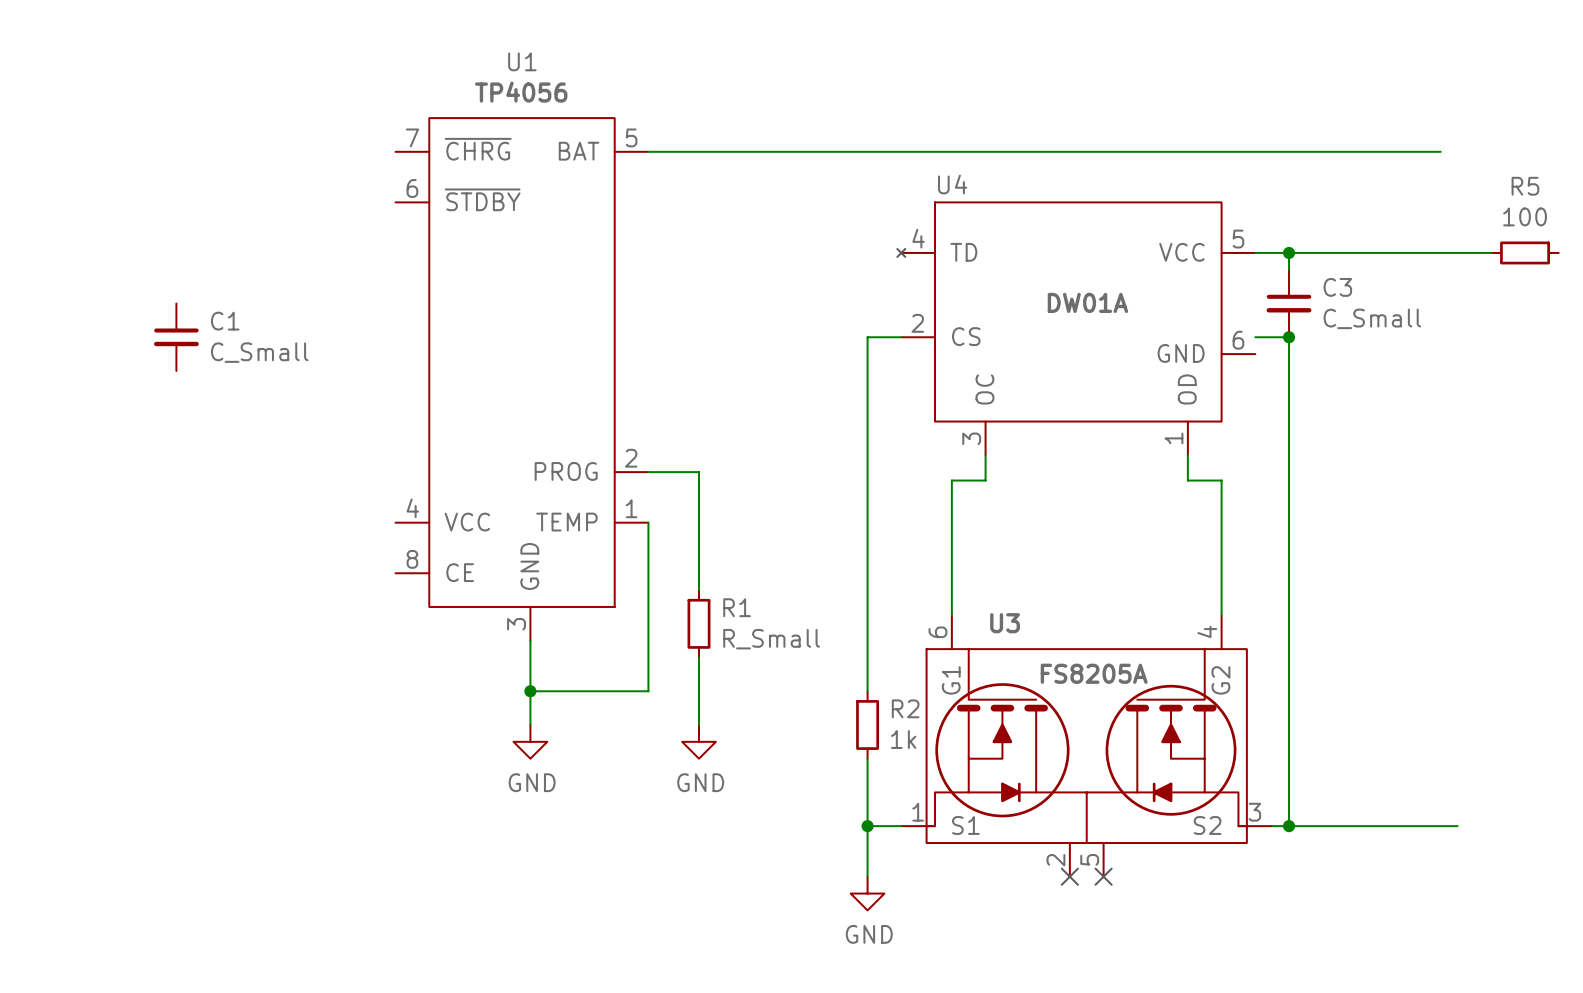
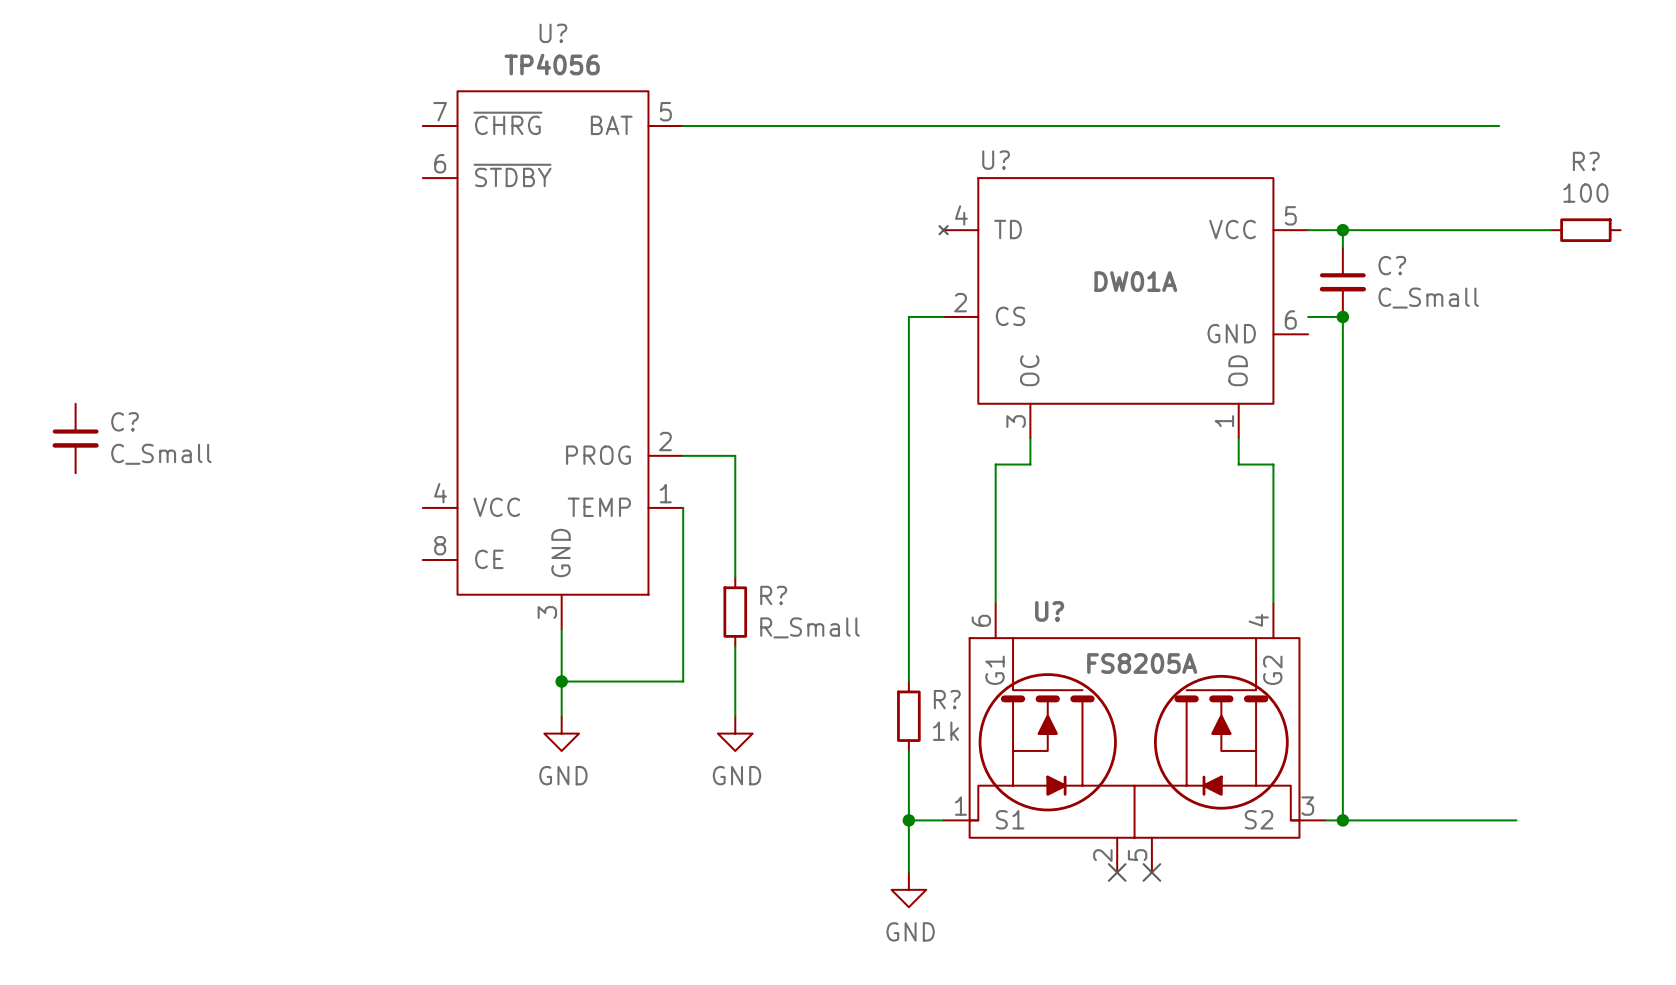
U1 name: U1 (522, 61) -> U? (553, 33)
U4 name: U4 (952, 184) -> U? (996, 160)
R5 name: R5 (1525, 186) -> R? (1586, 161)
C3 name: C3 (1337, 287) -> C? (1392, 265)
C1: C_Small (176, 337) -> none
C?: none -> C_Small (75, 438)
R1 name: R1 (737, 607) -> R? (773, 595)
U3 name: U3 (1005, 623) -> U? (1049, 611)
R2 name: R2 (905, 708) -> R? (947, 699)

